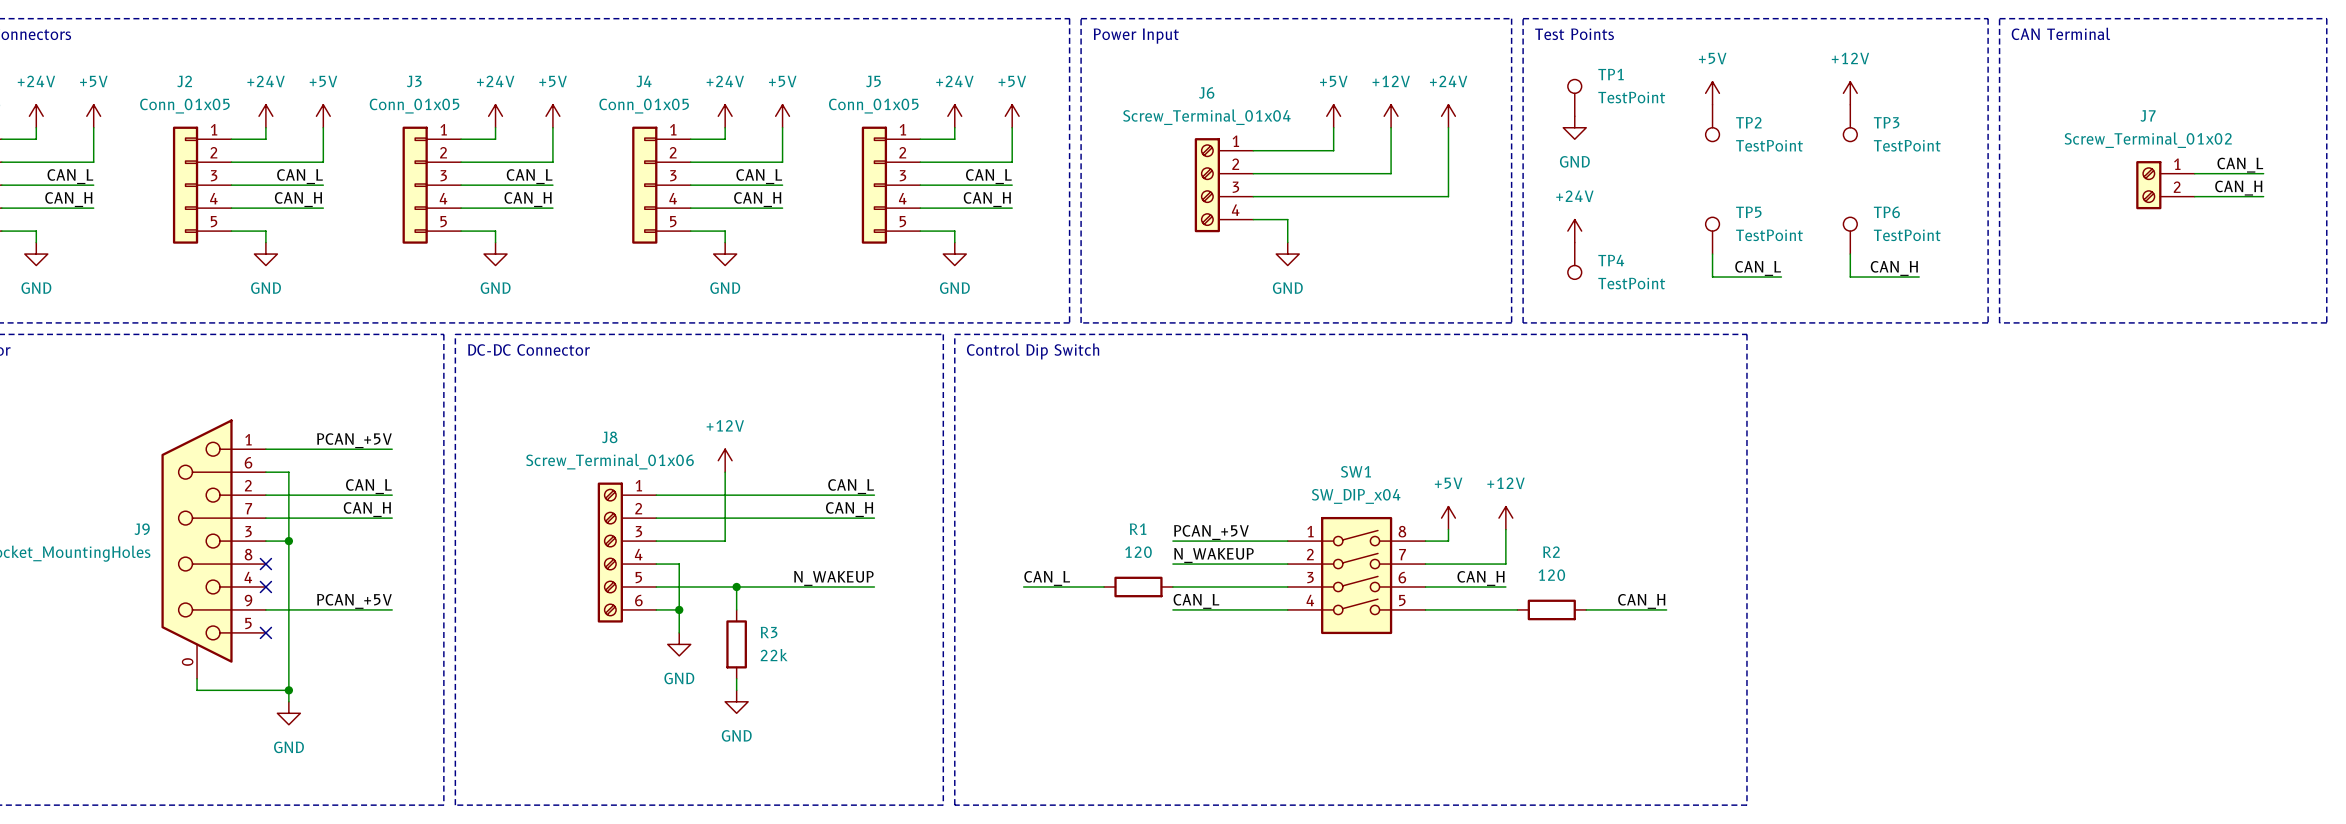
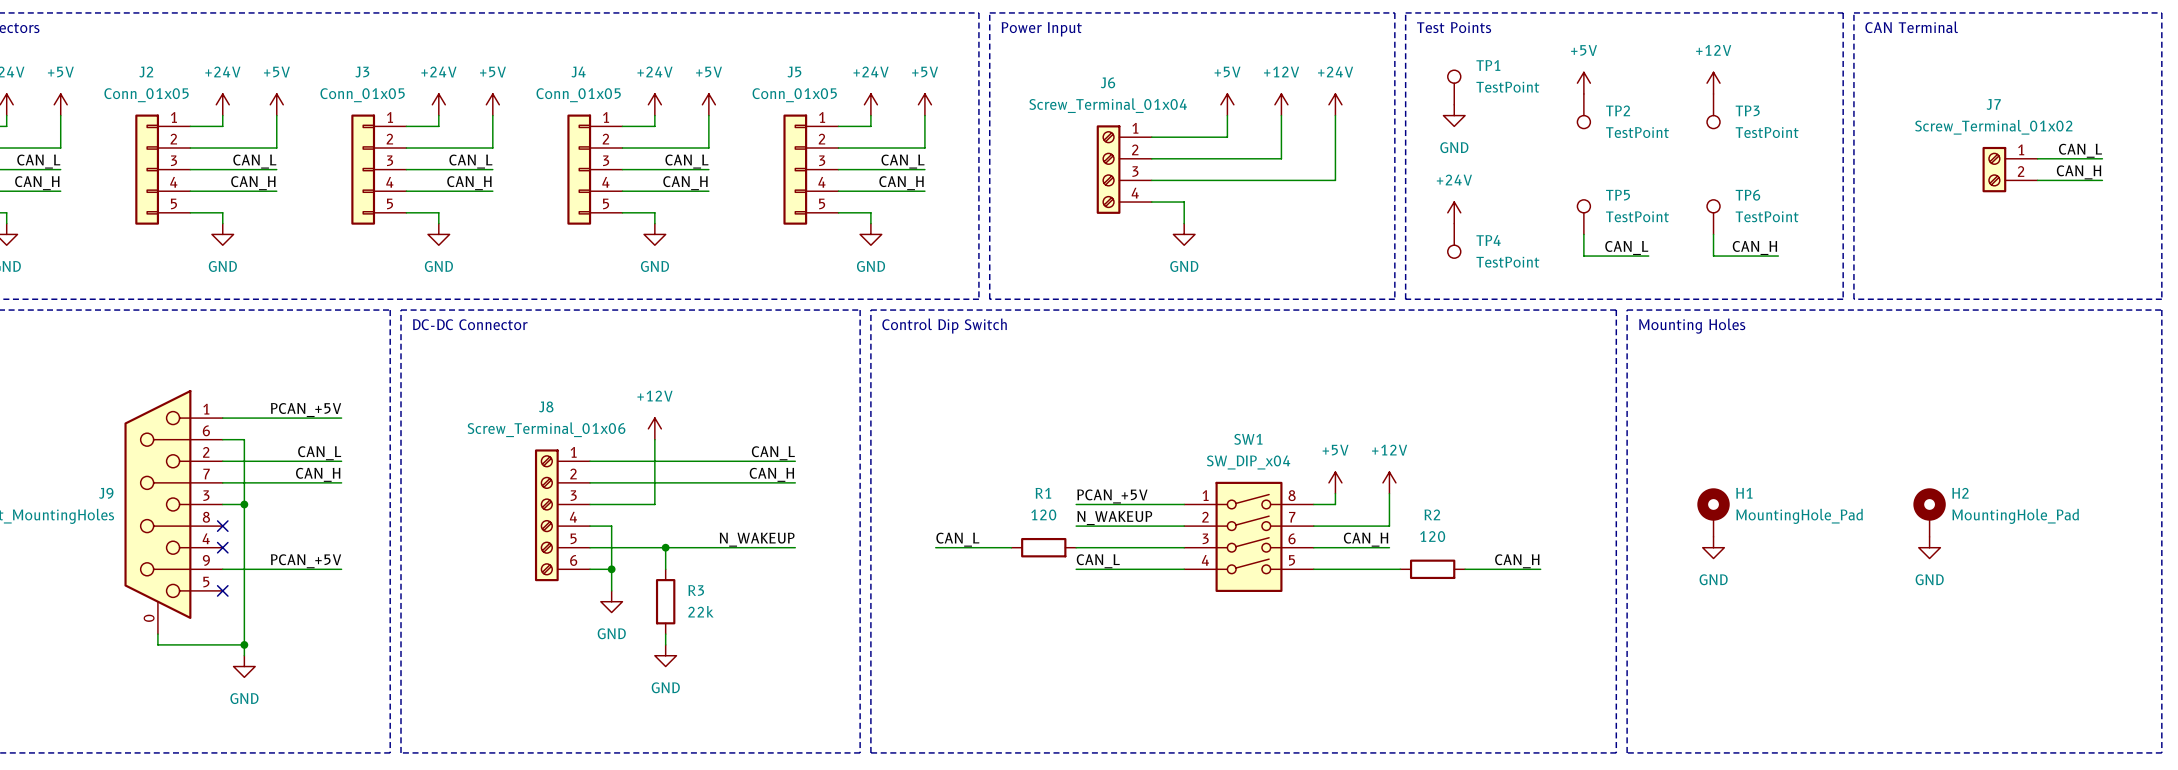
line: none -> (1627, 310) (2161, 310) (2161, 752) (1627, 752) (1627, 310)
text: none -> Mounting Holes (1692, 326)
H1: none -> MountingHole_Pad (1713, 512)
H2: none -> MountingHole_Pad (1929, 512)
power symbol: none -> GND (1713, 547)
power symbol: none -> GND (1929, 547)

